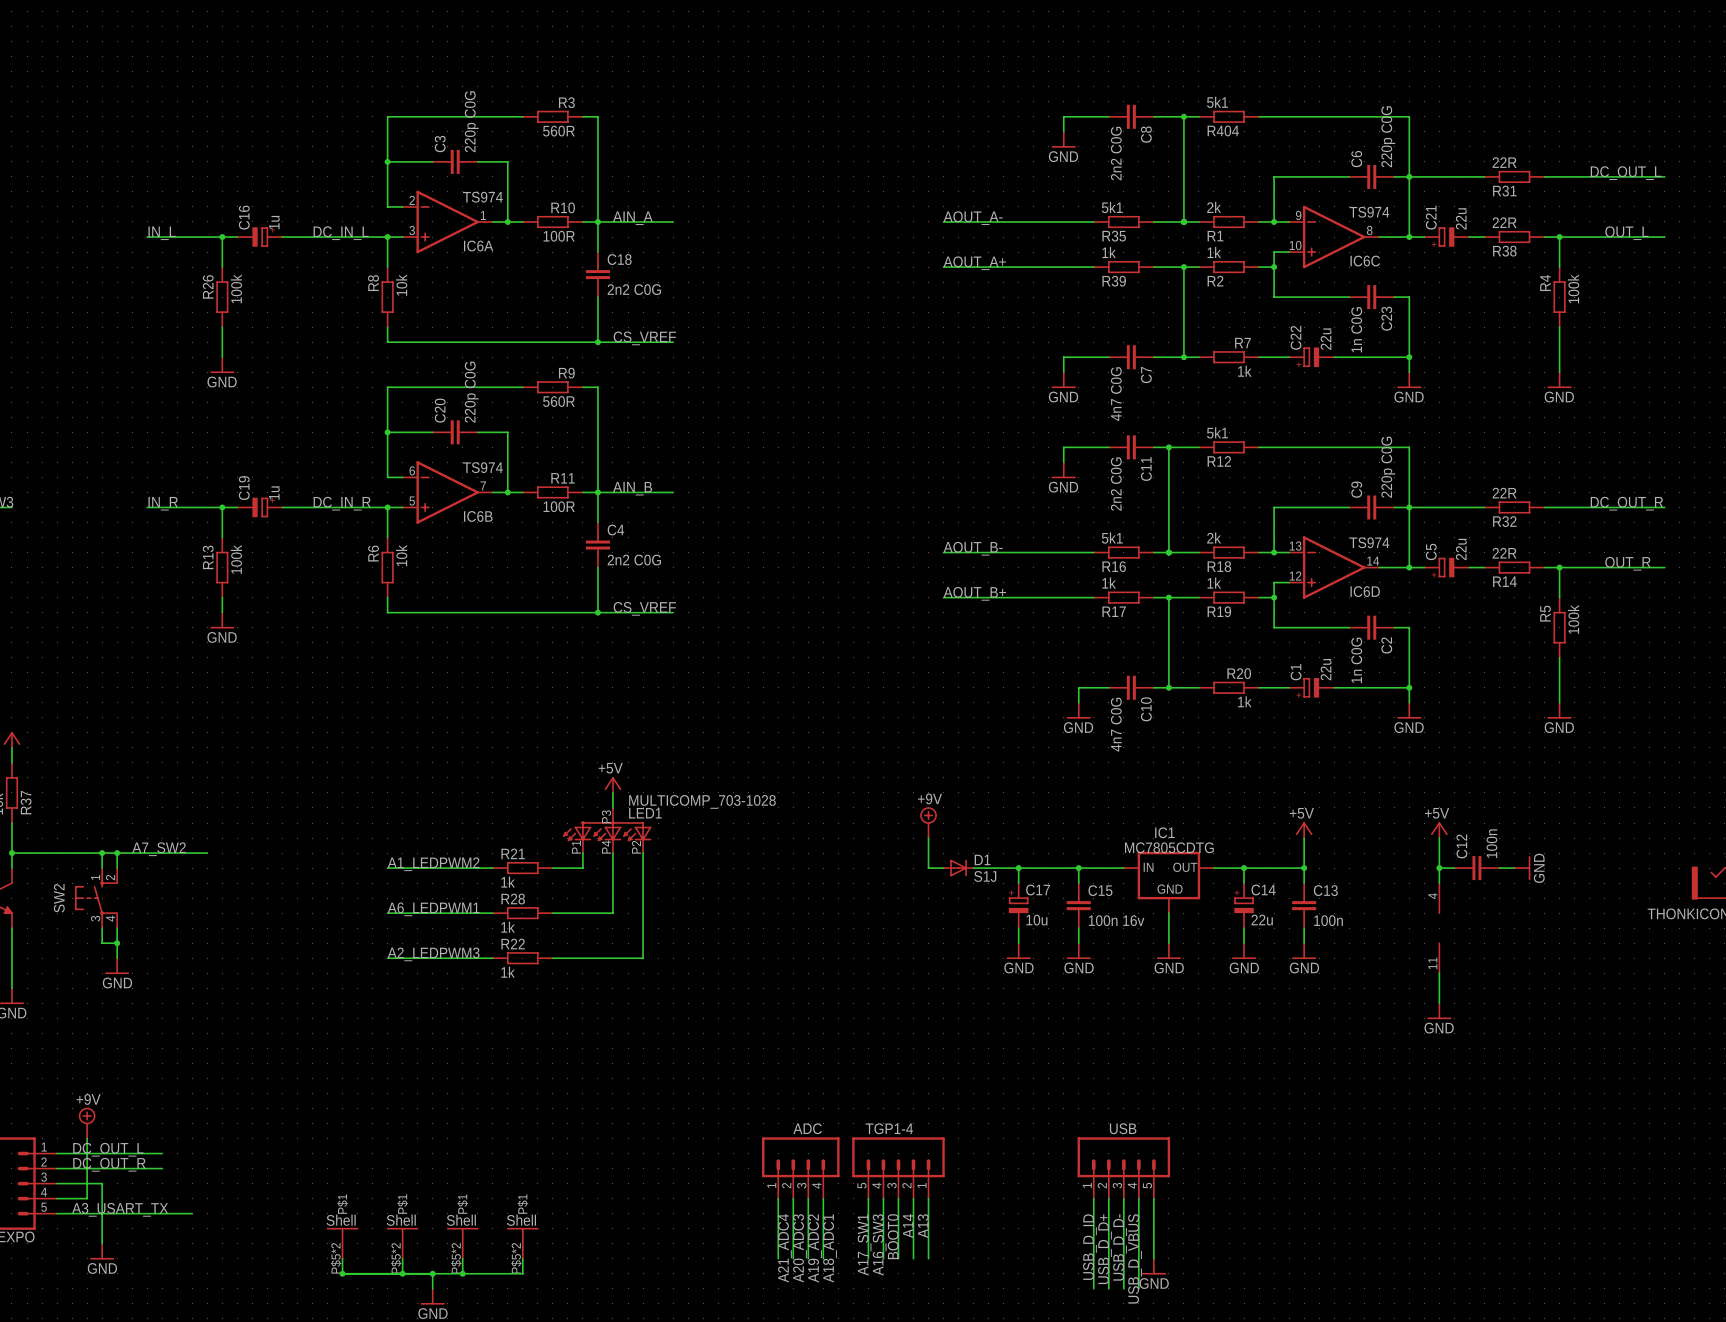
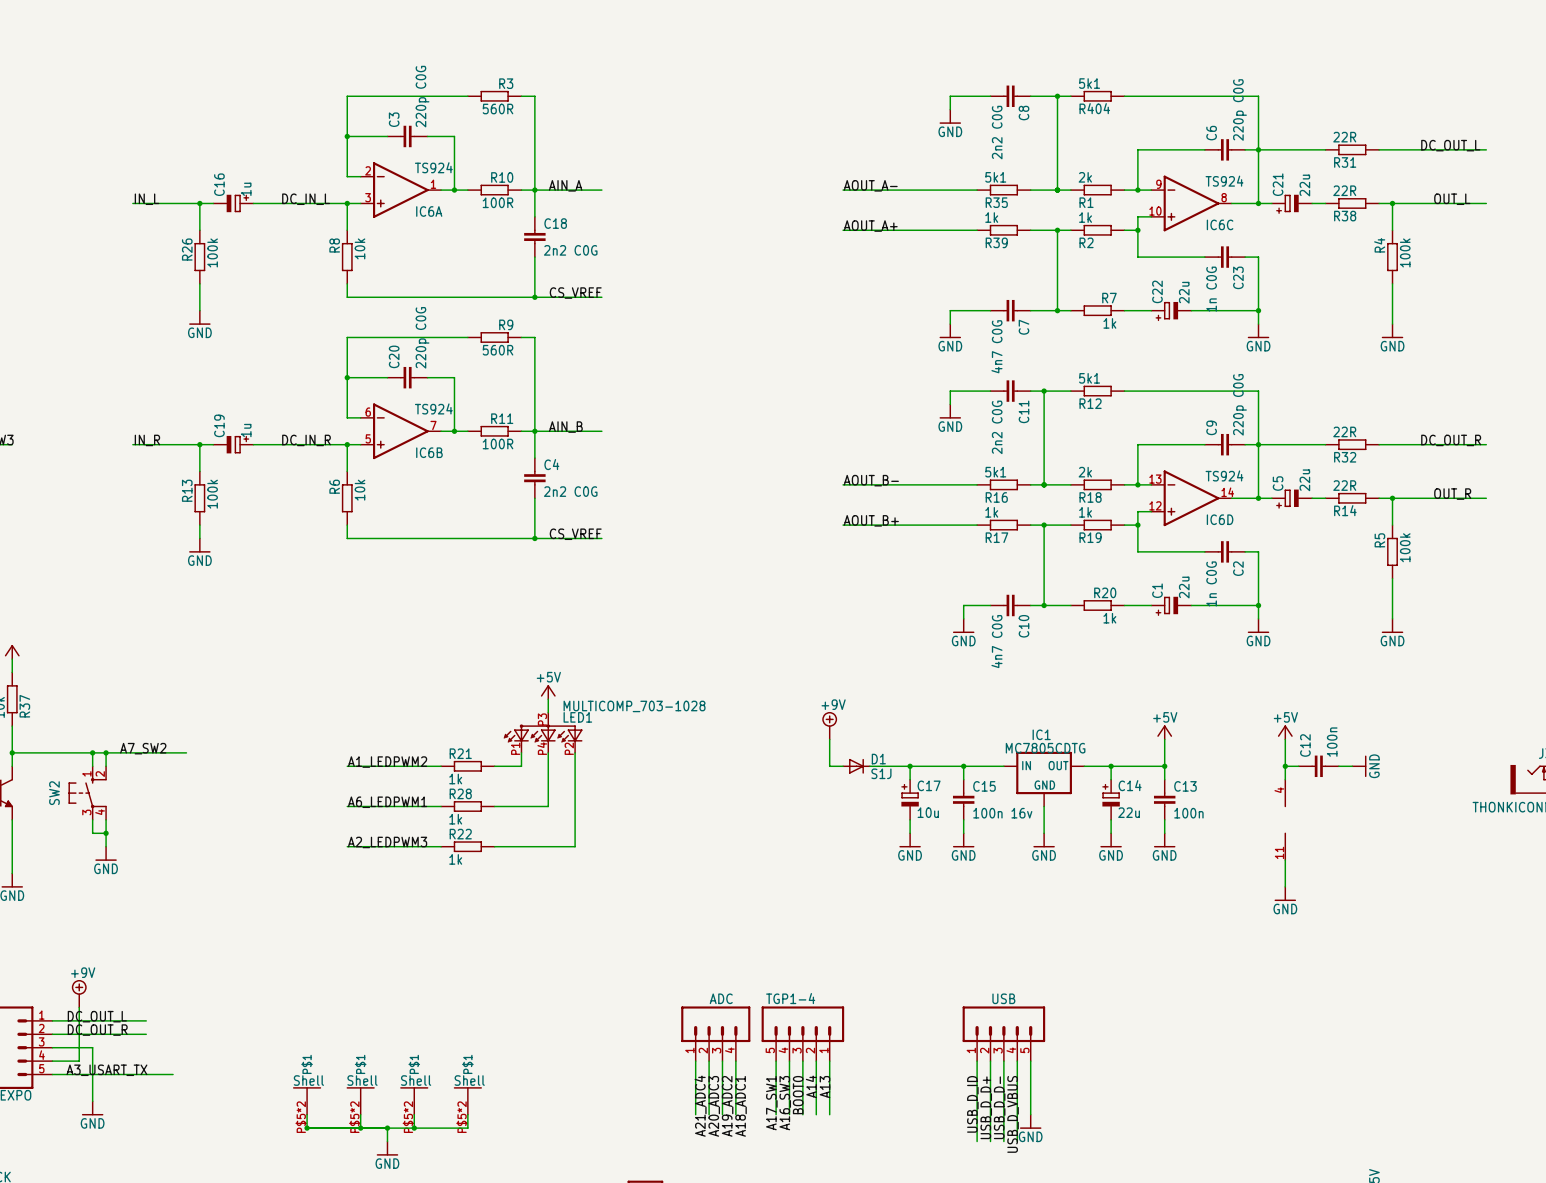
IC6A value: TS974 (482, 197) -> TS924 (433, 167)
IC6C value: TS974 (1369, 212) -> TS924 (1224, 181)
IC6B value: TS974 (482, 467) -> TS924 (433, 408)
IC6D value: TS974 (1369, 542) -> TS924 (1224, 475)

